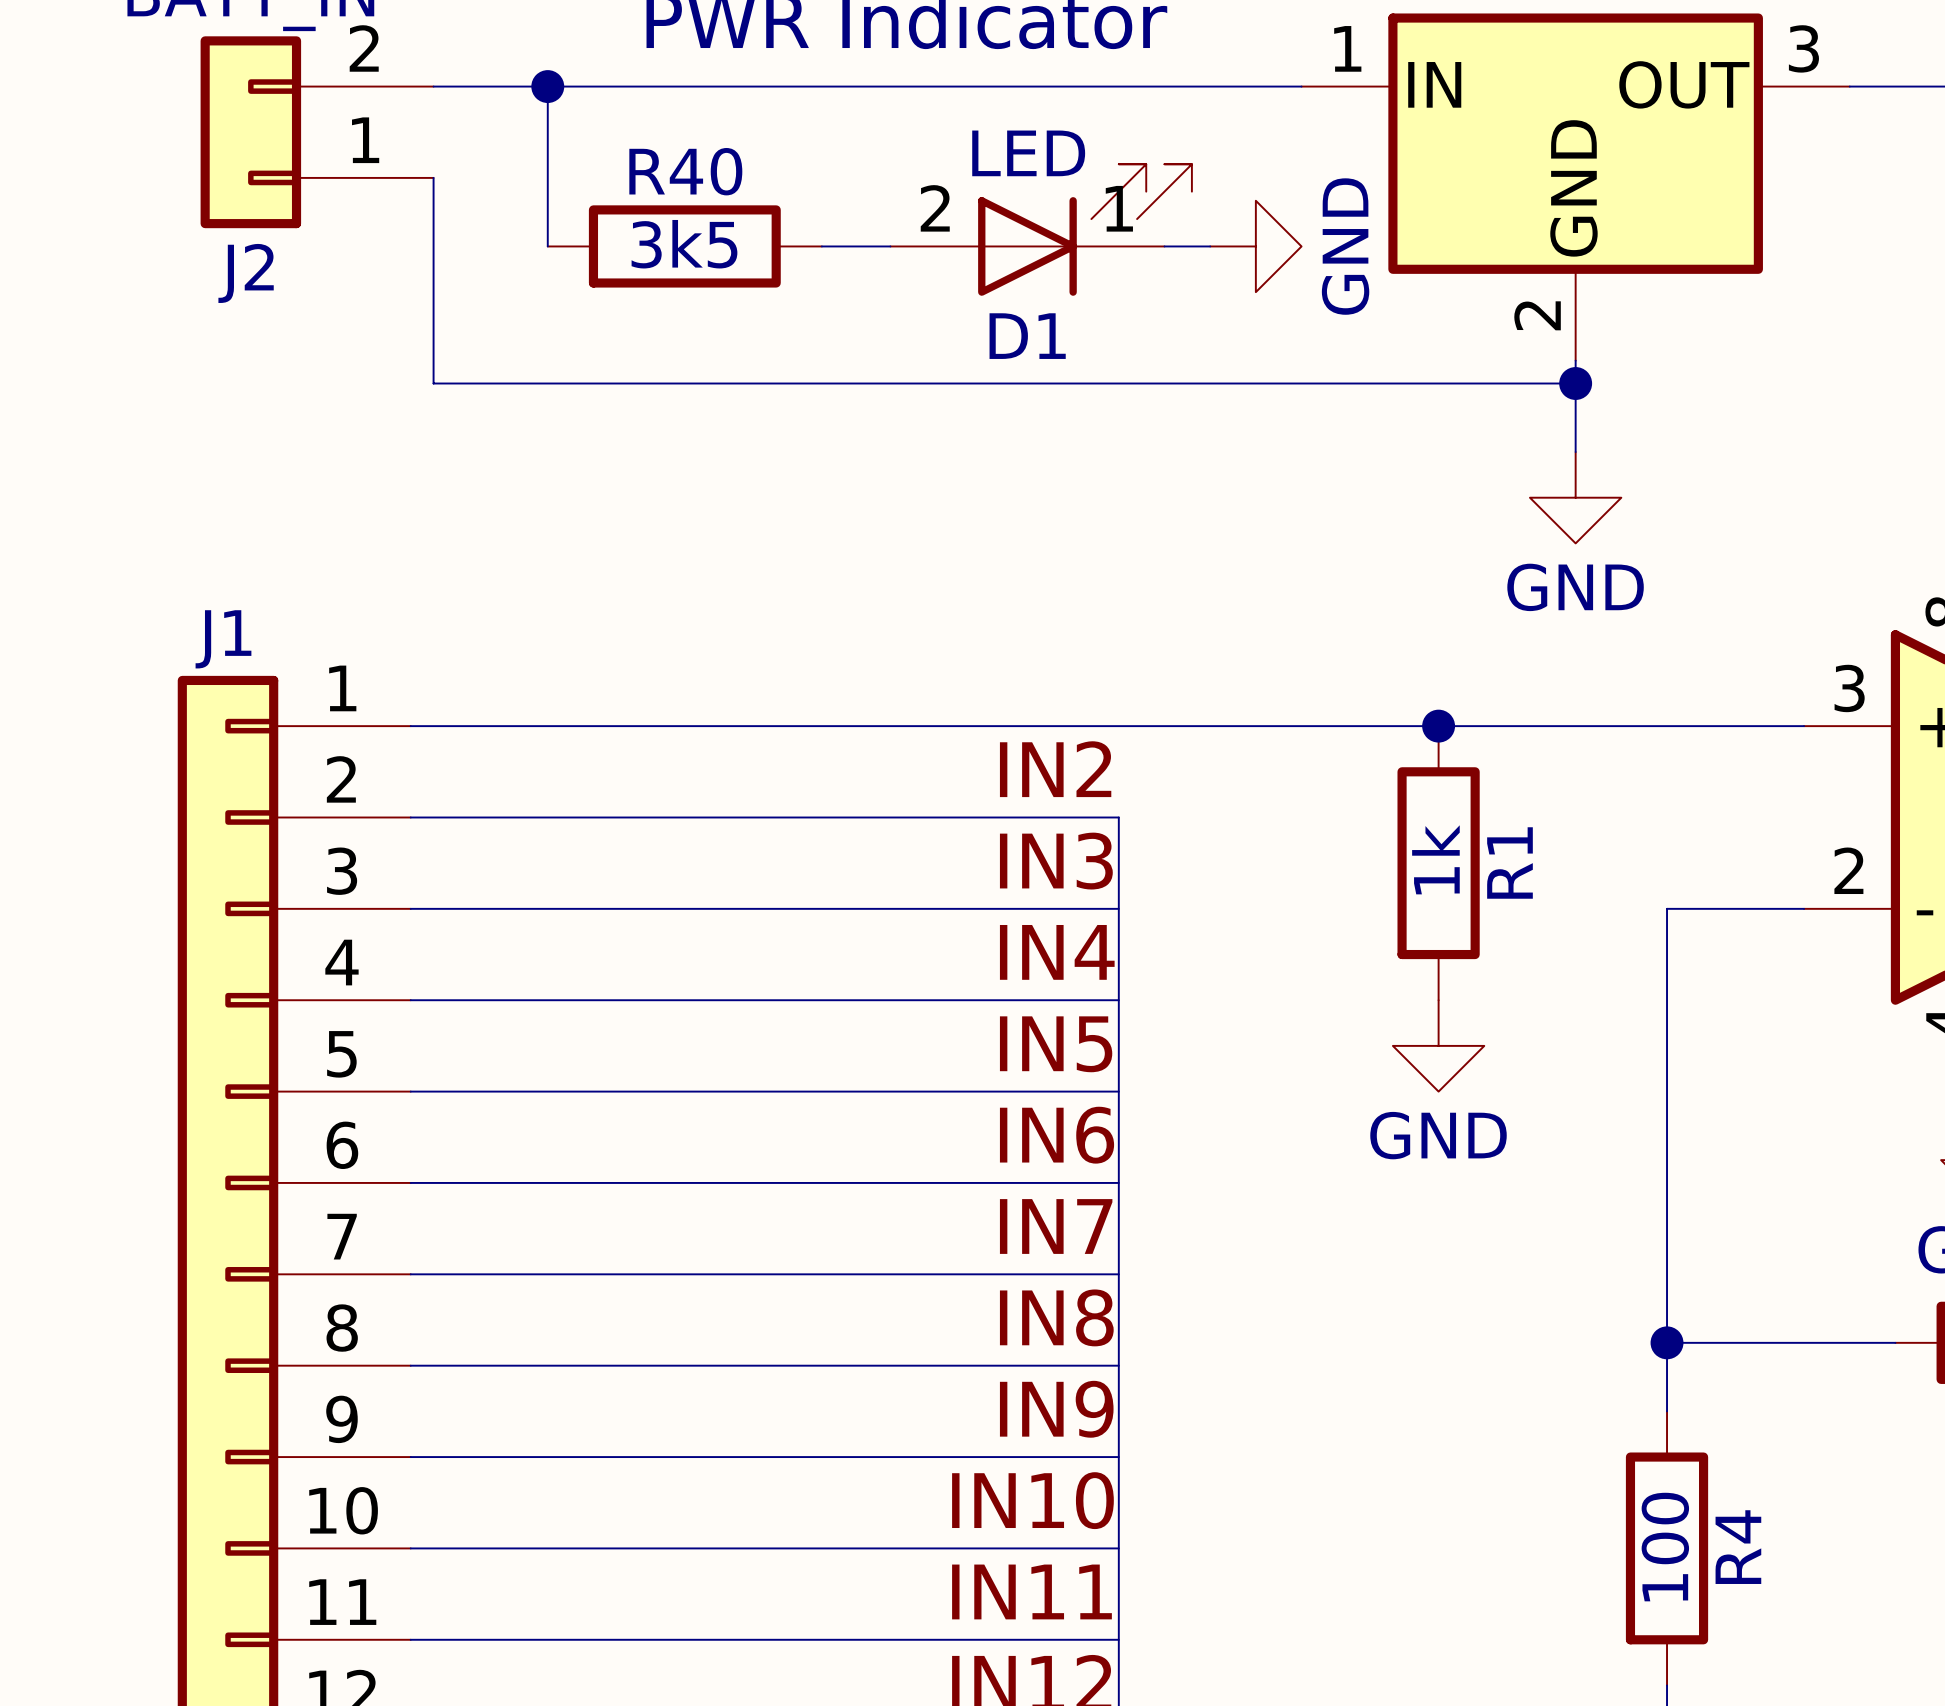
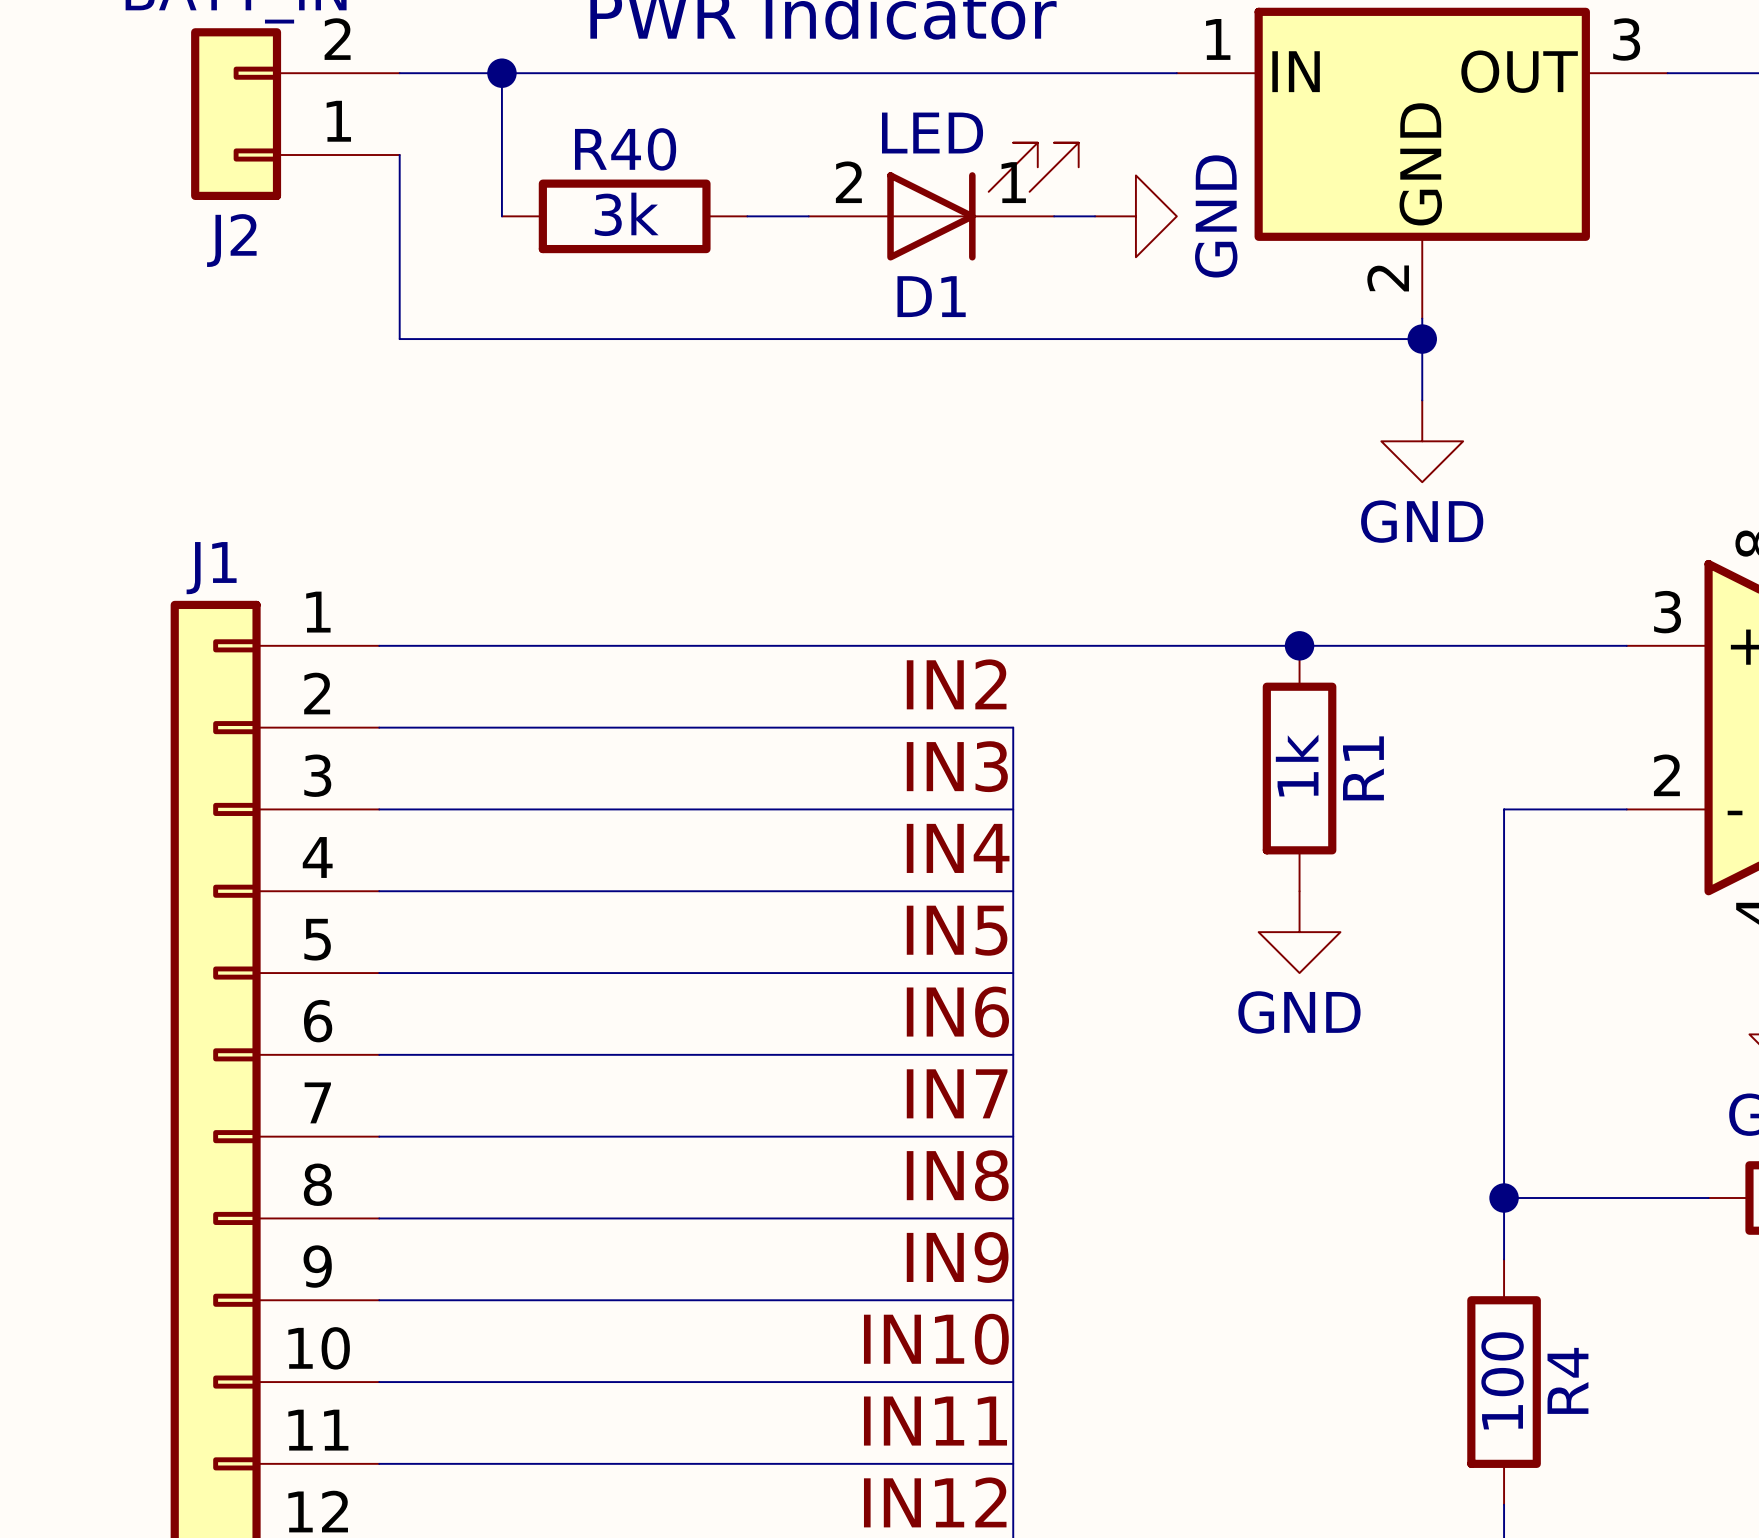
R40 value: 3k5 (684, 244) -> 3k (626, 214)

